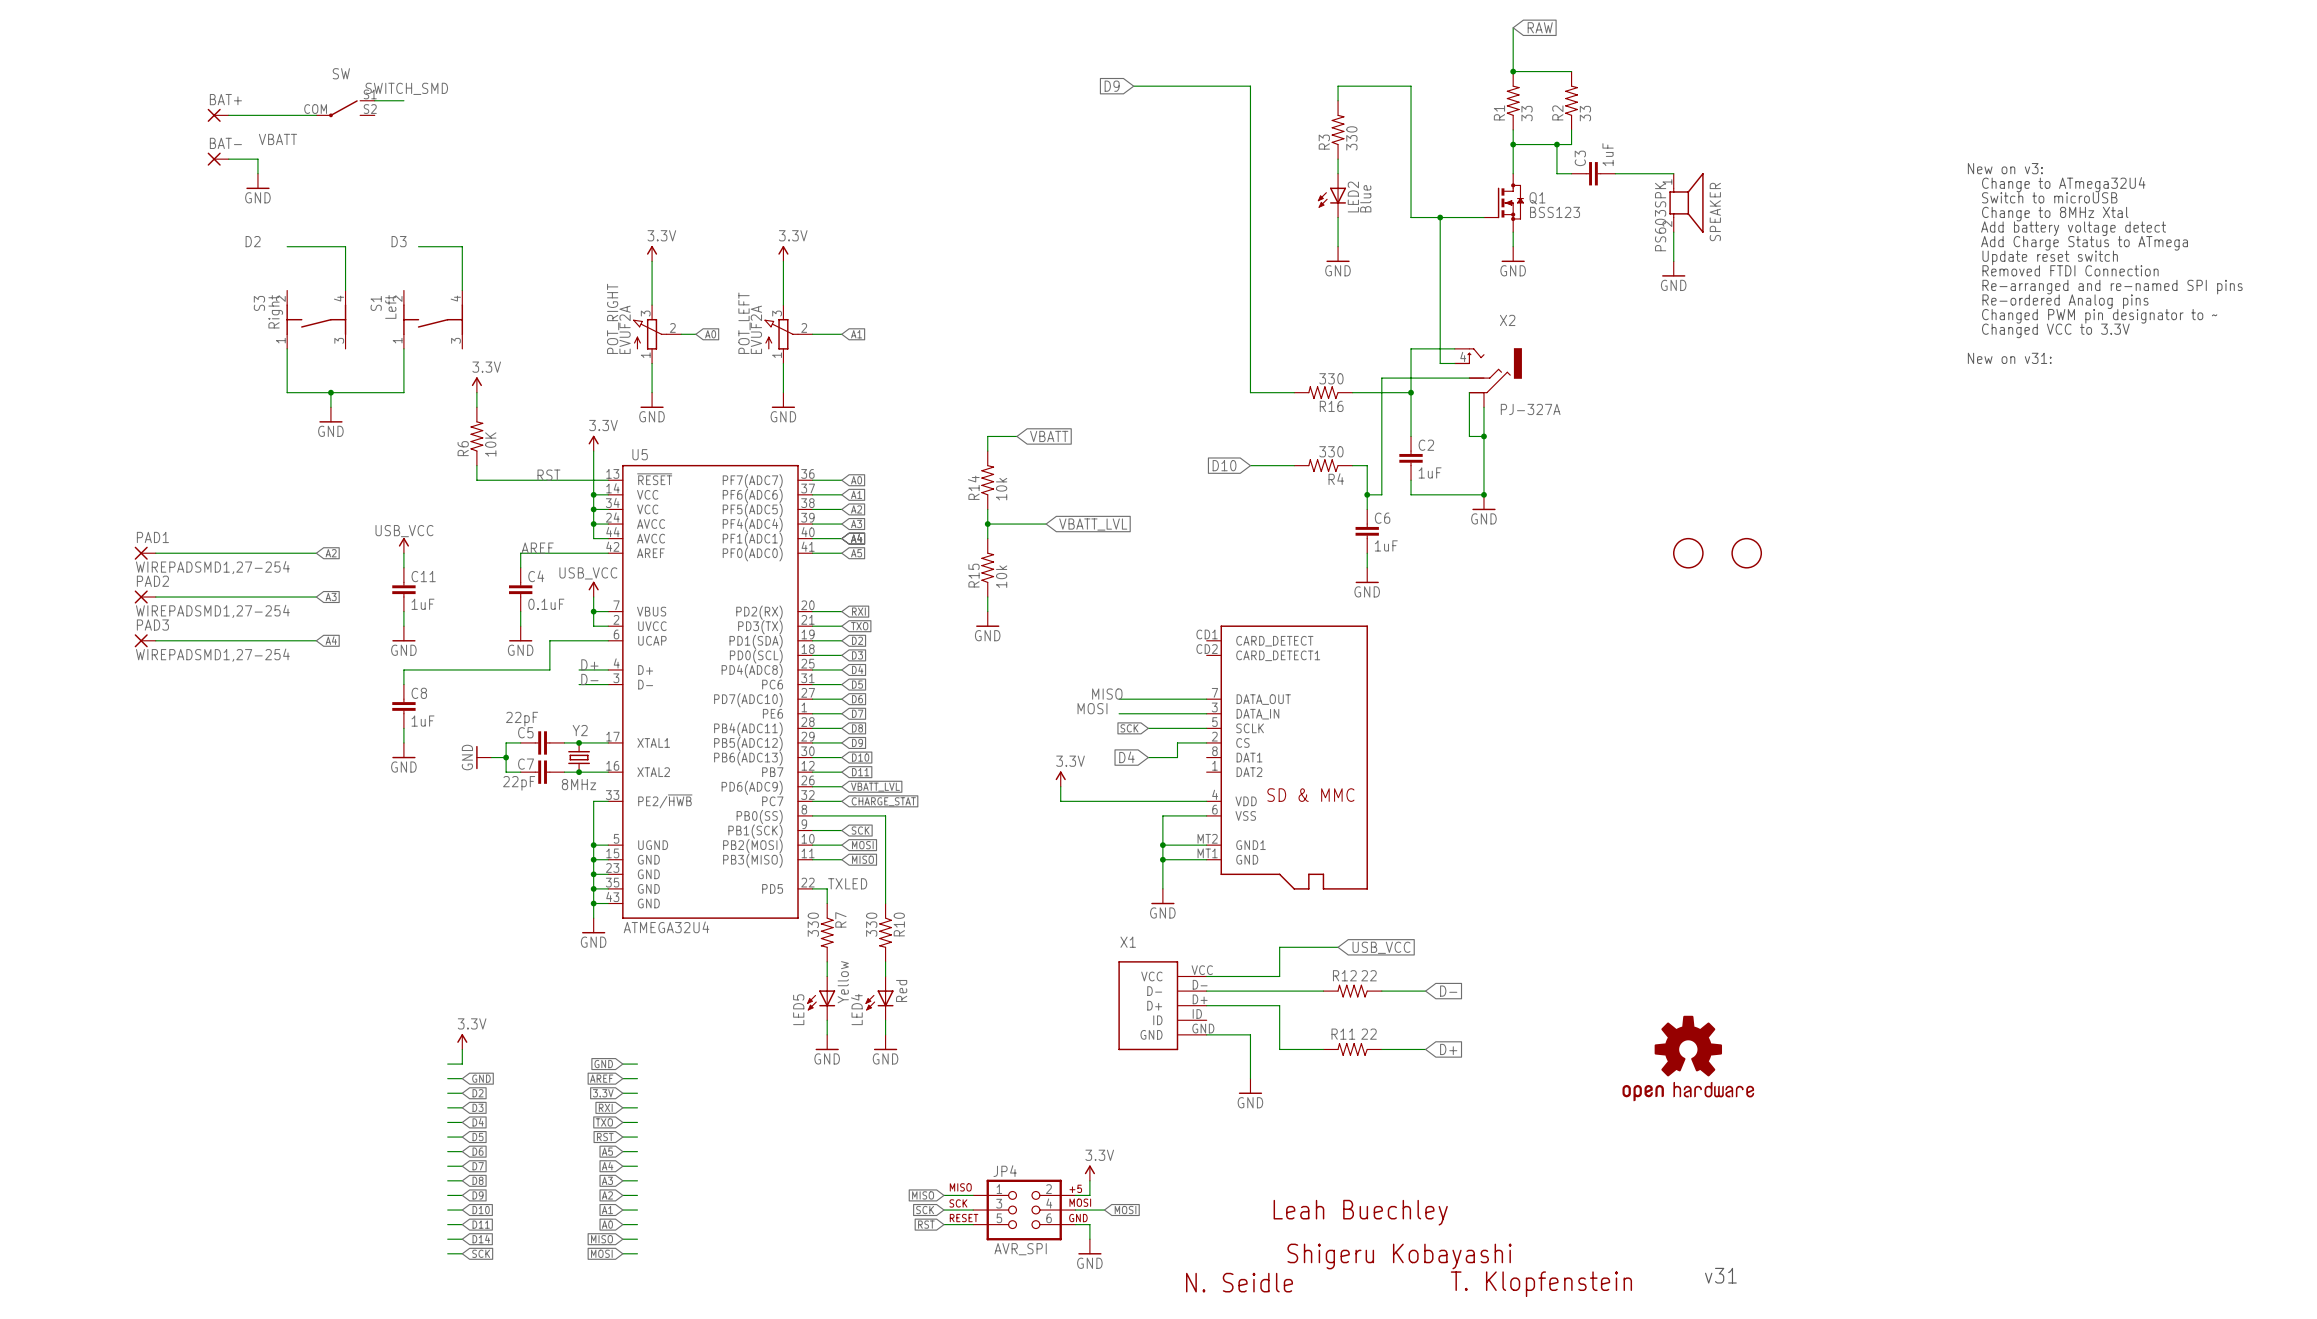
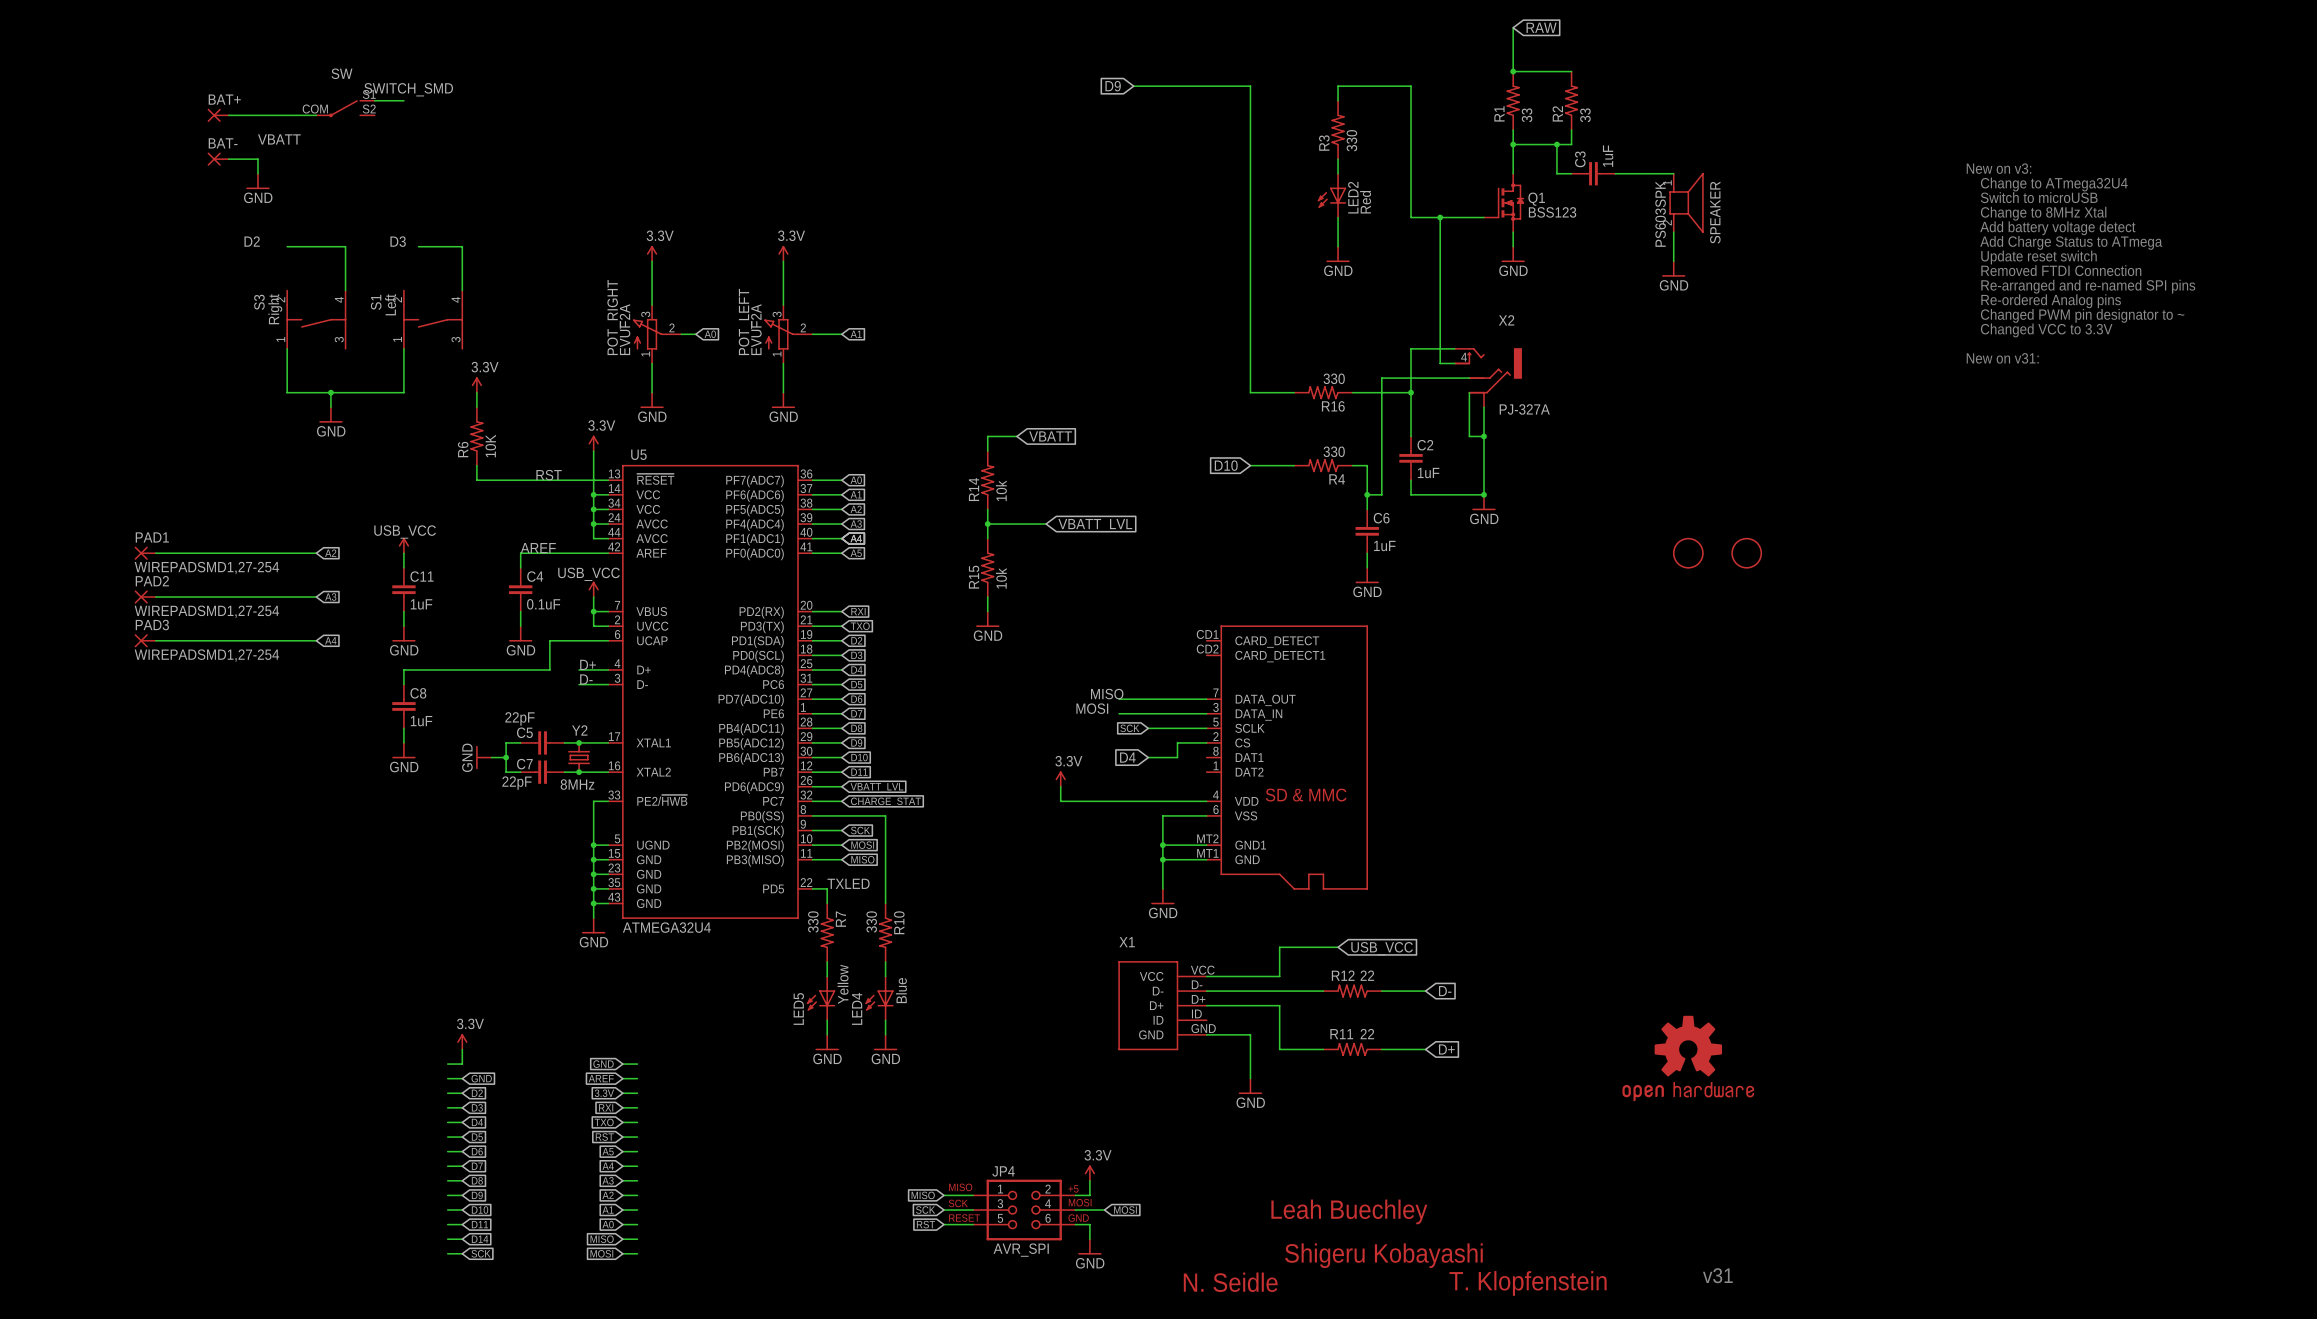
LED2 value: Blue (1365, 198) -> Red (1365, 202)
LED4 value: Red (901, 990) -> Blue (901, 990)

